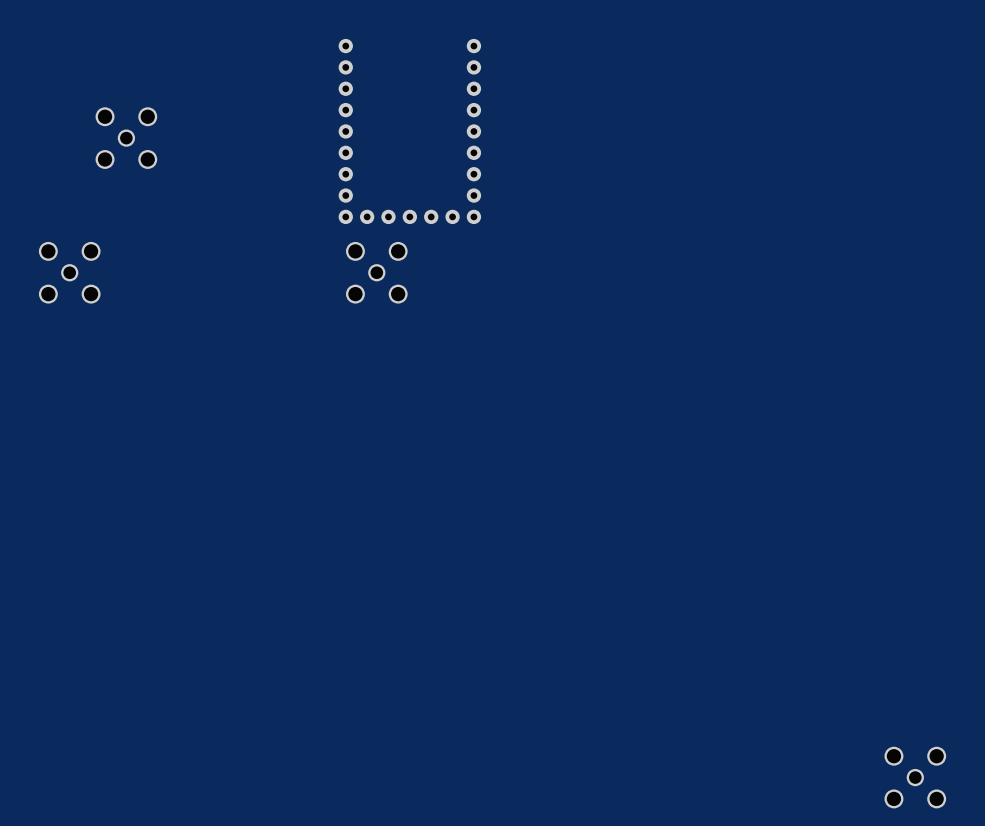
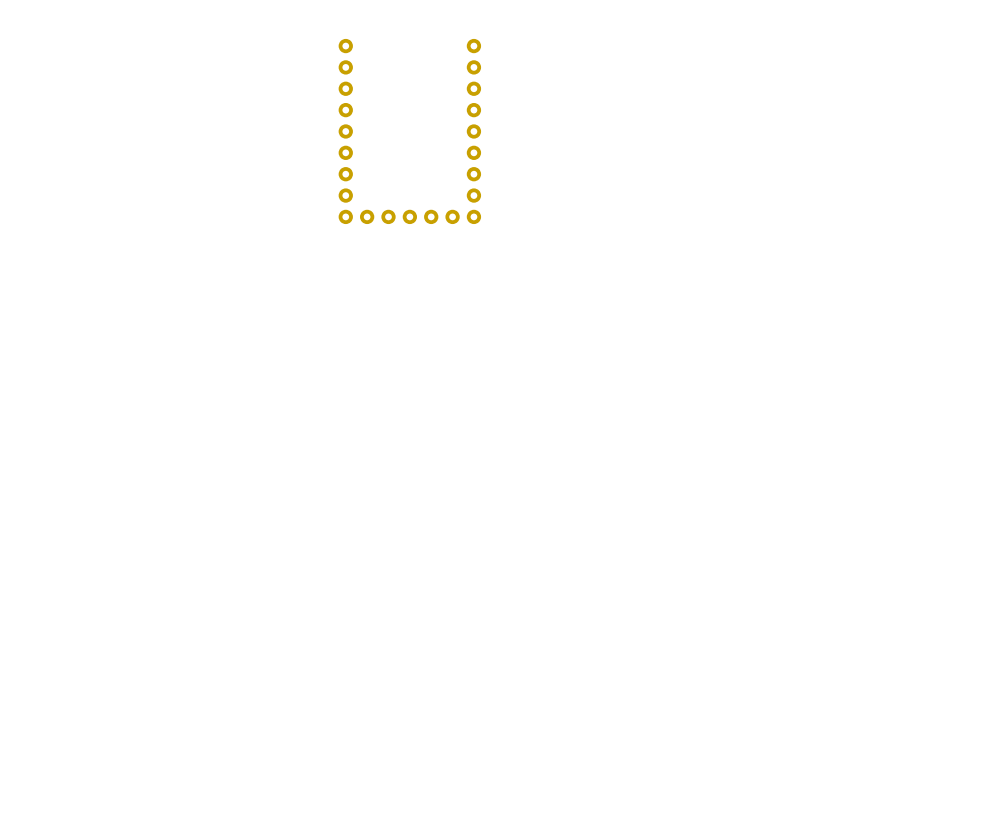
part: (126, 138) -> none
part: (69, 272) -> none
part: (376, 272) -> none
part: (915, 777) -> none

